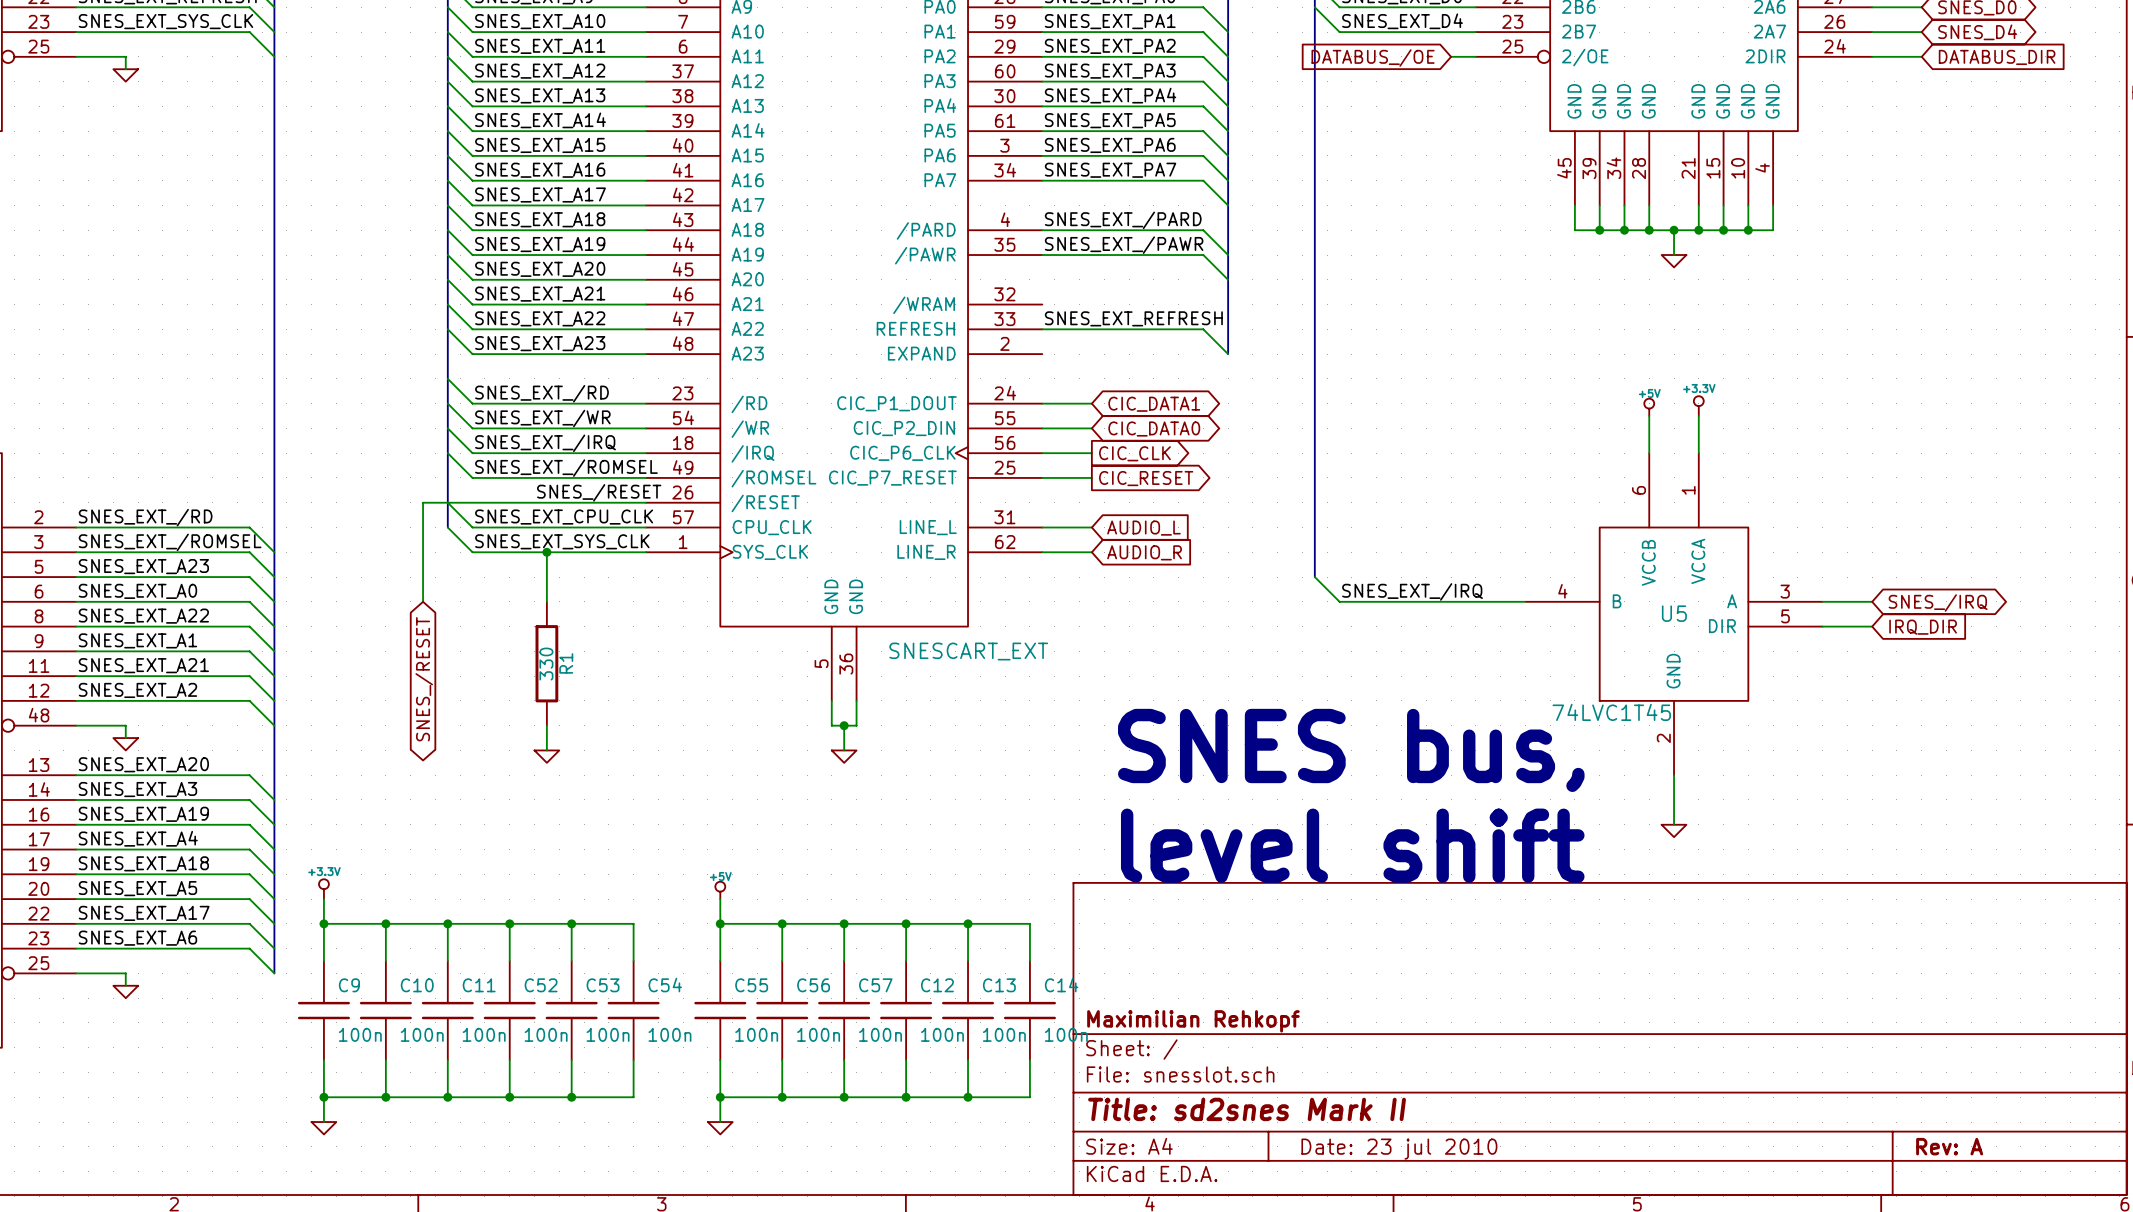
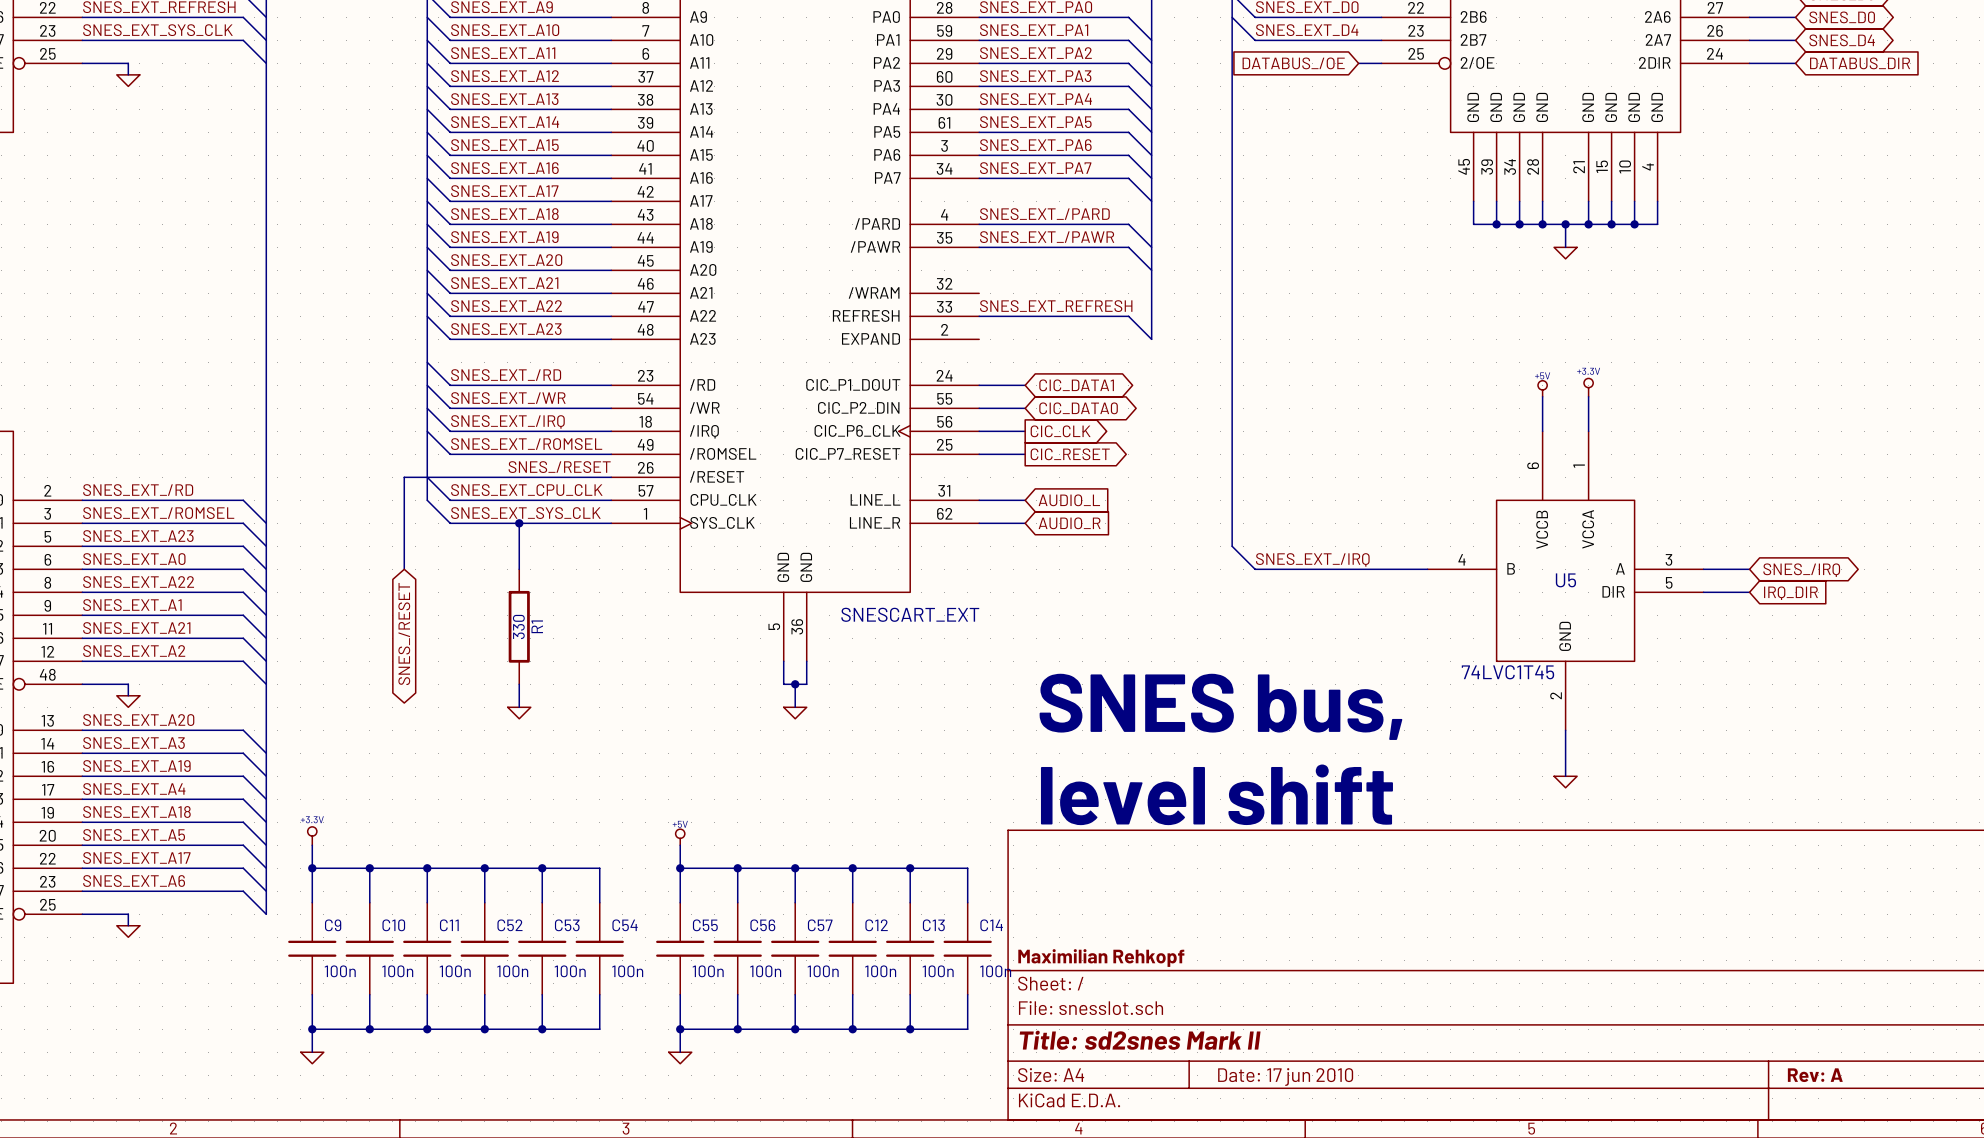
title block: Date: 23 jul 2010 (1399, 1149) -> Date: 17 jun 2010 (1285, 1077)

